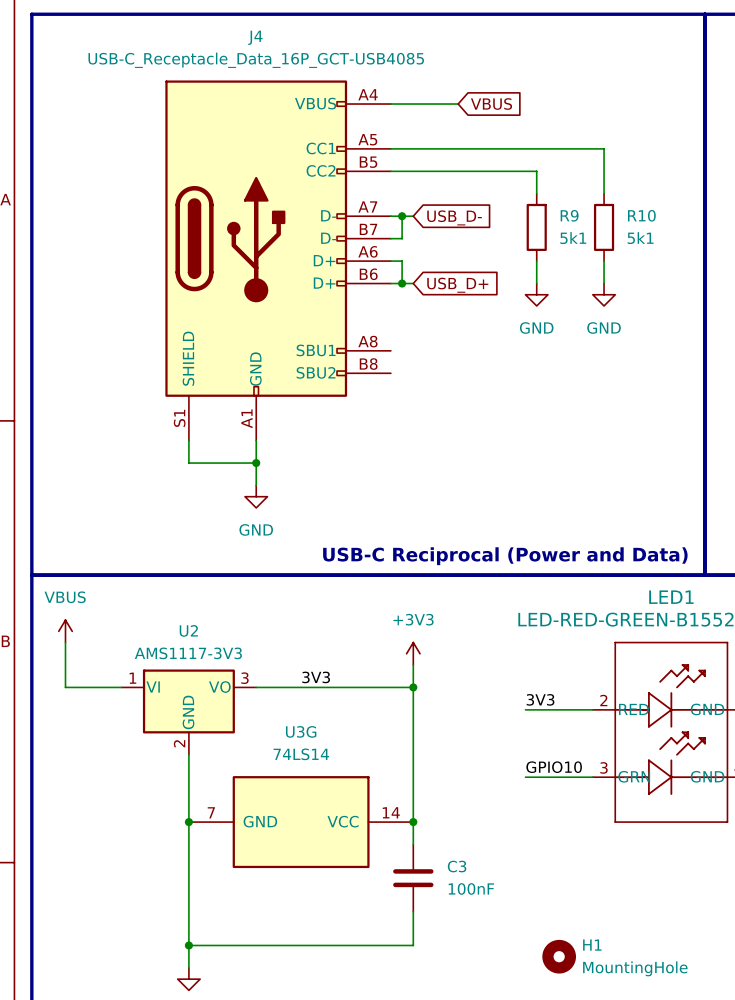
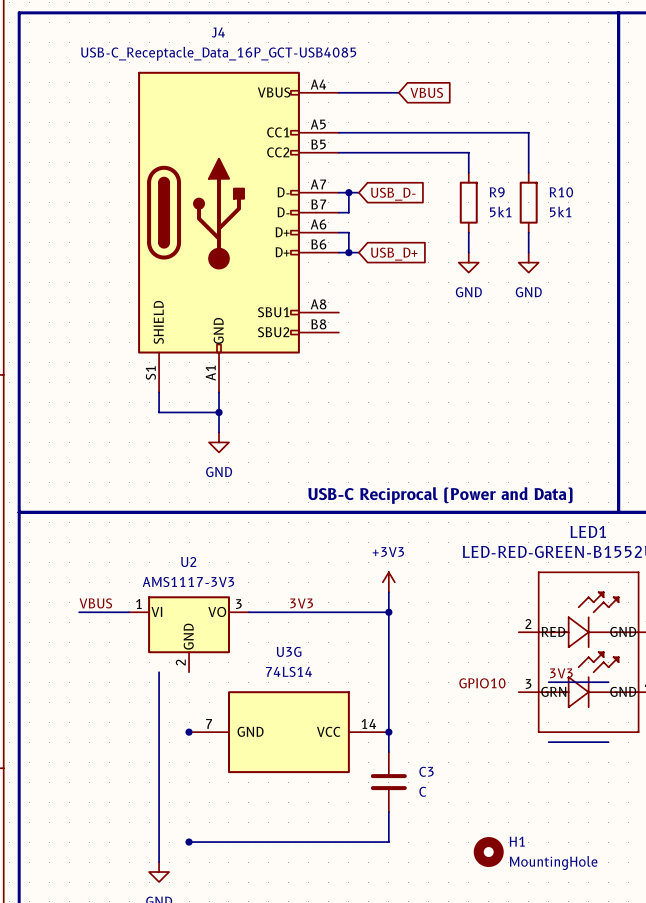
power symbol: VBUS (65, 631) -> none
wire: (65, 642) (65, 687) (99, 687) -> none
power symbol position: +3V3 (413, 653) -> +3V3 (388, 582)
wire: (413, 664) (413, 844) -> (388, 592) (388, 752)
label: none -> VBUS (95, 603)
label position: 3V3 (316, 677) -> 3V3 (301, 603)
wire: none -> (358, 612) (388, 612)
junction position: (413, 687) -> (388, 612)
label: 3V3 (540, 699) -> none
wire: (525, 709) (592, 709) -> (548, 682) (608, 682)
U2 position: (188, 712) -> (189, 634)
label: none -> 3V3 (561, 673)
wire: (525, 777) (592, 777) -> (548, 742) (608, 742)
junction position: (188, 822) -> (189, 732)
U3G position: (301, 822) -> (288, 732)
junction position: (413, 822) -> (388, 732)
C3 position: (413, 878) -> (388, 782)
C3 value: 100nF (471, 888) -> C (422, 791)
wire: (413, 911) (413, 945) -> (388, 812) (388, 842) (358, 842)
wire: (188, 945) (222, 945) -> none
junction position: (188, 945) -> (189, 842)

